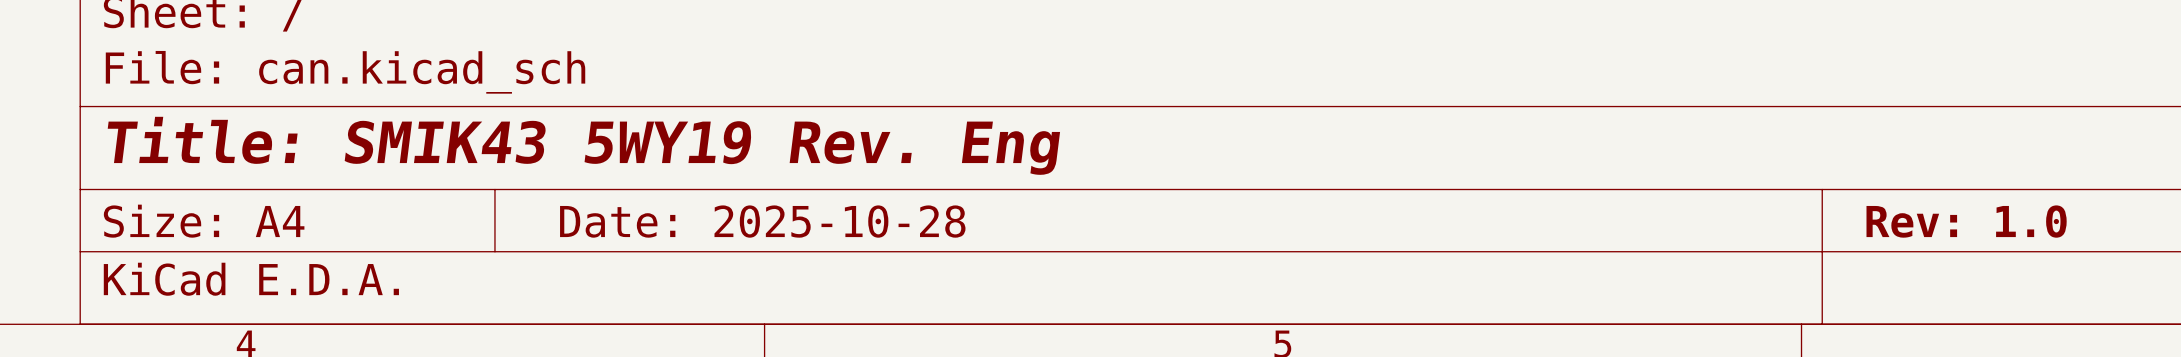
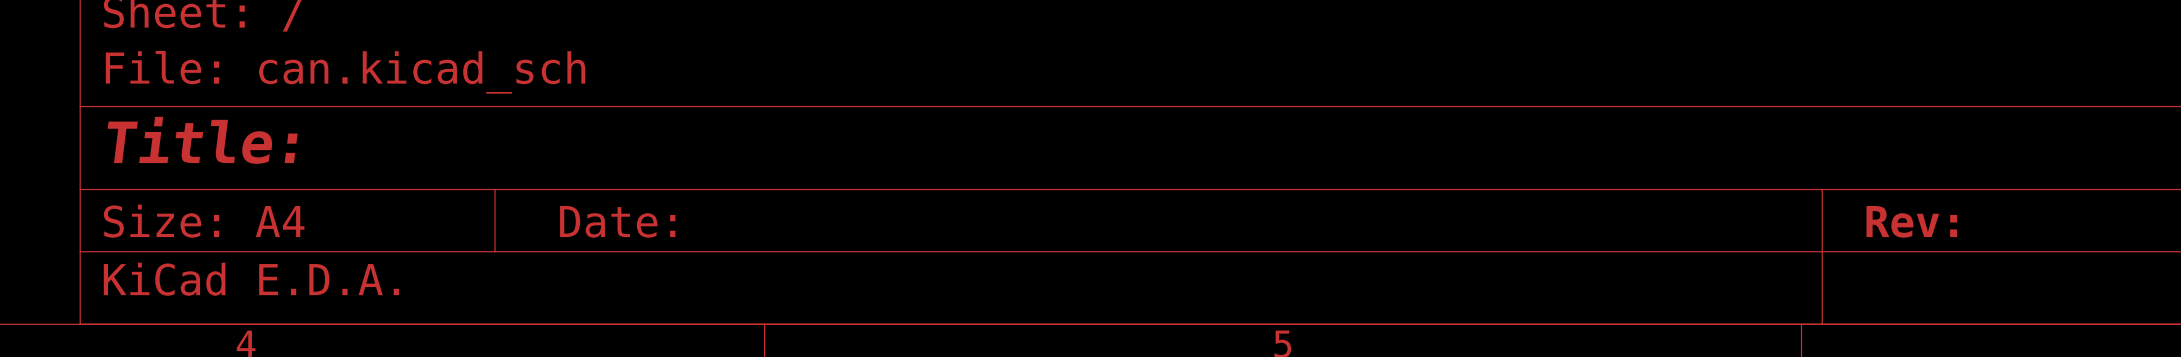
title block: Title: SMIK43 5WY19 Rev. Eng (583, 145) -> Title: (202, 140)
title block: Date: 2025-10-28 (762, 221) -> Date: (617, 221)
title block: Rev: 1.0 (1966, 221) -> Rev: (1911, 221)

